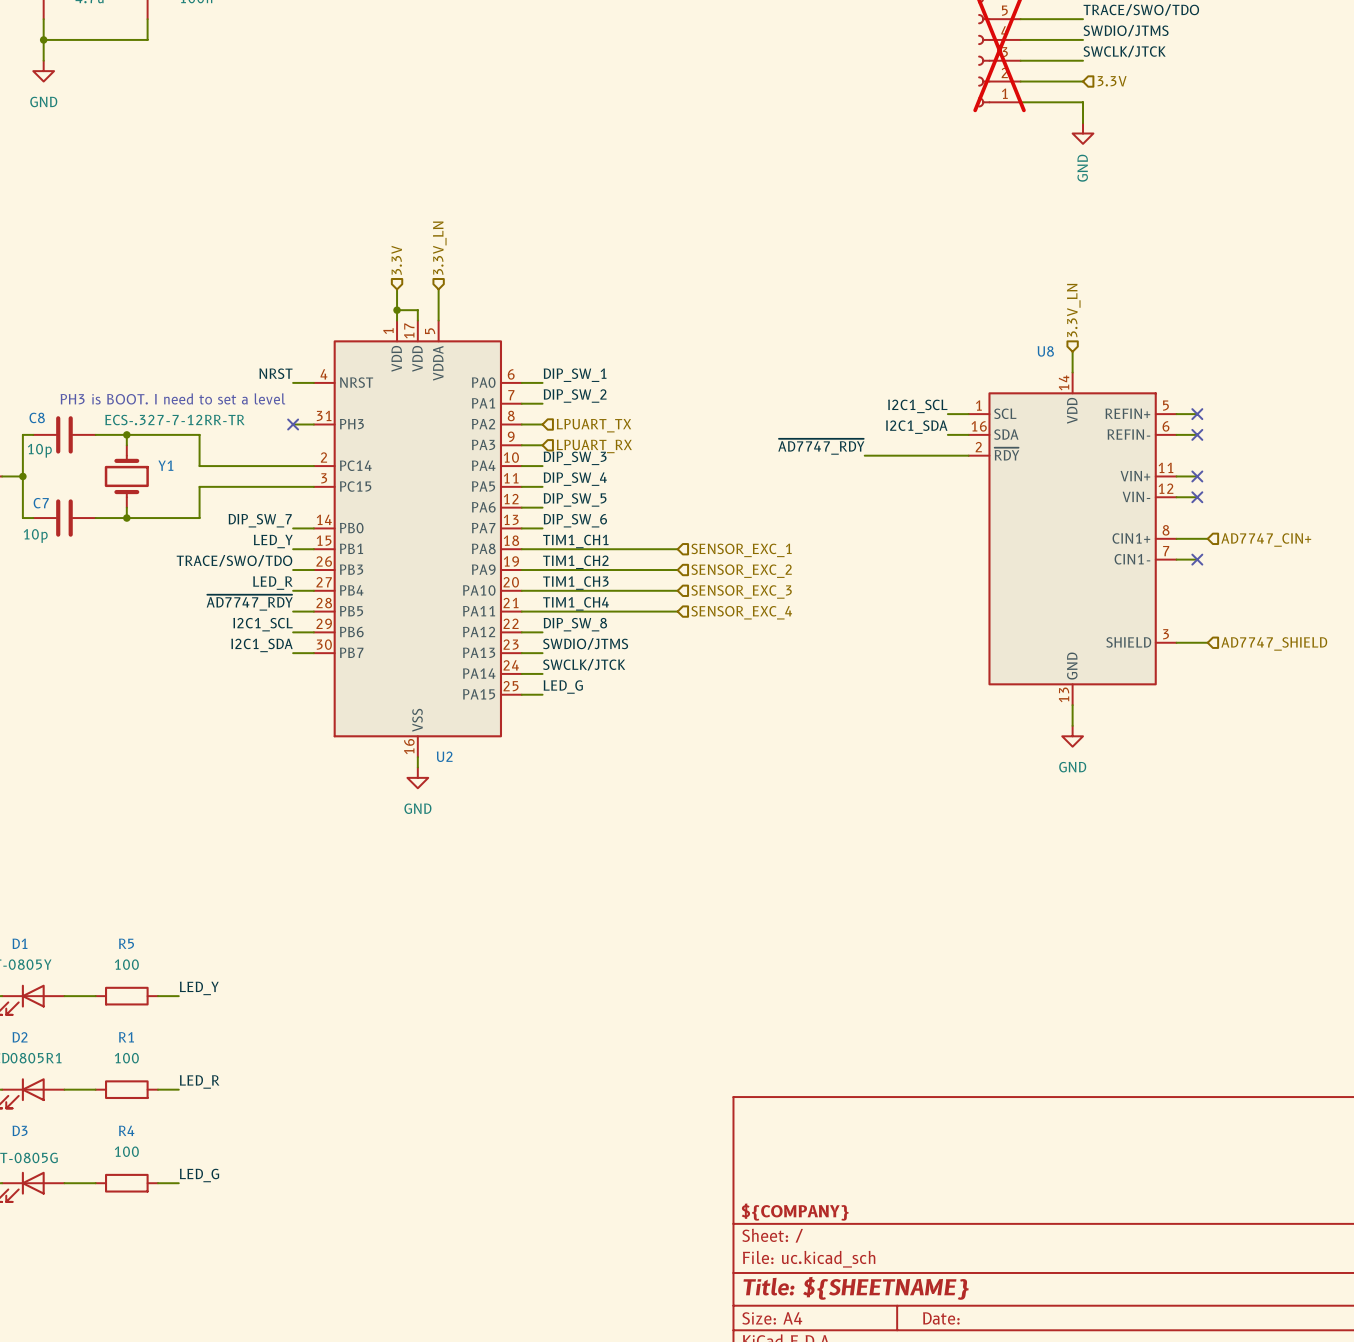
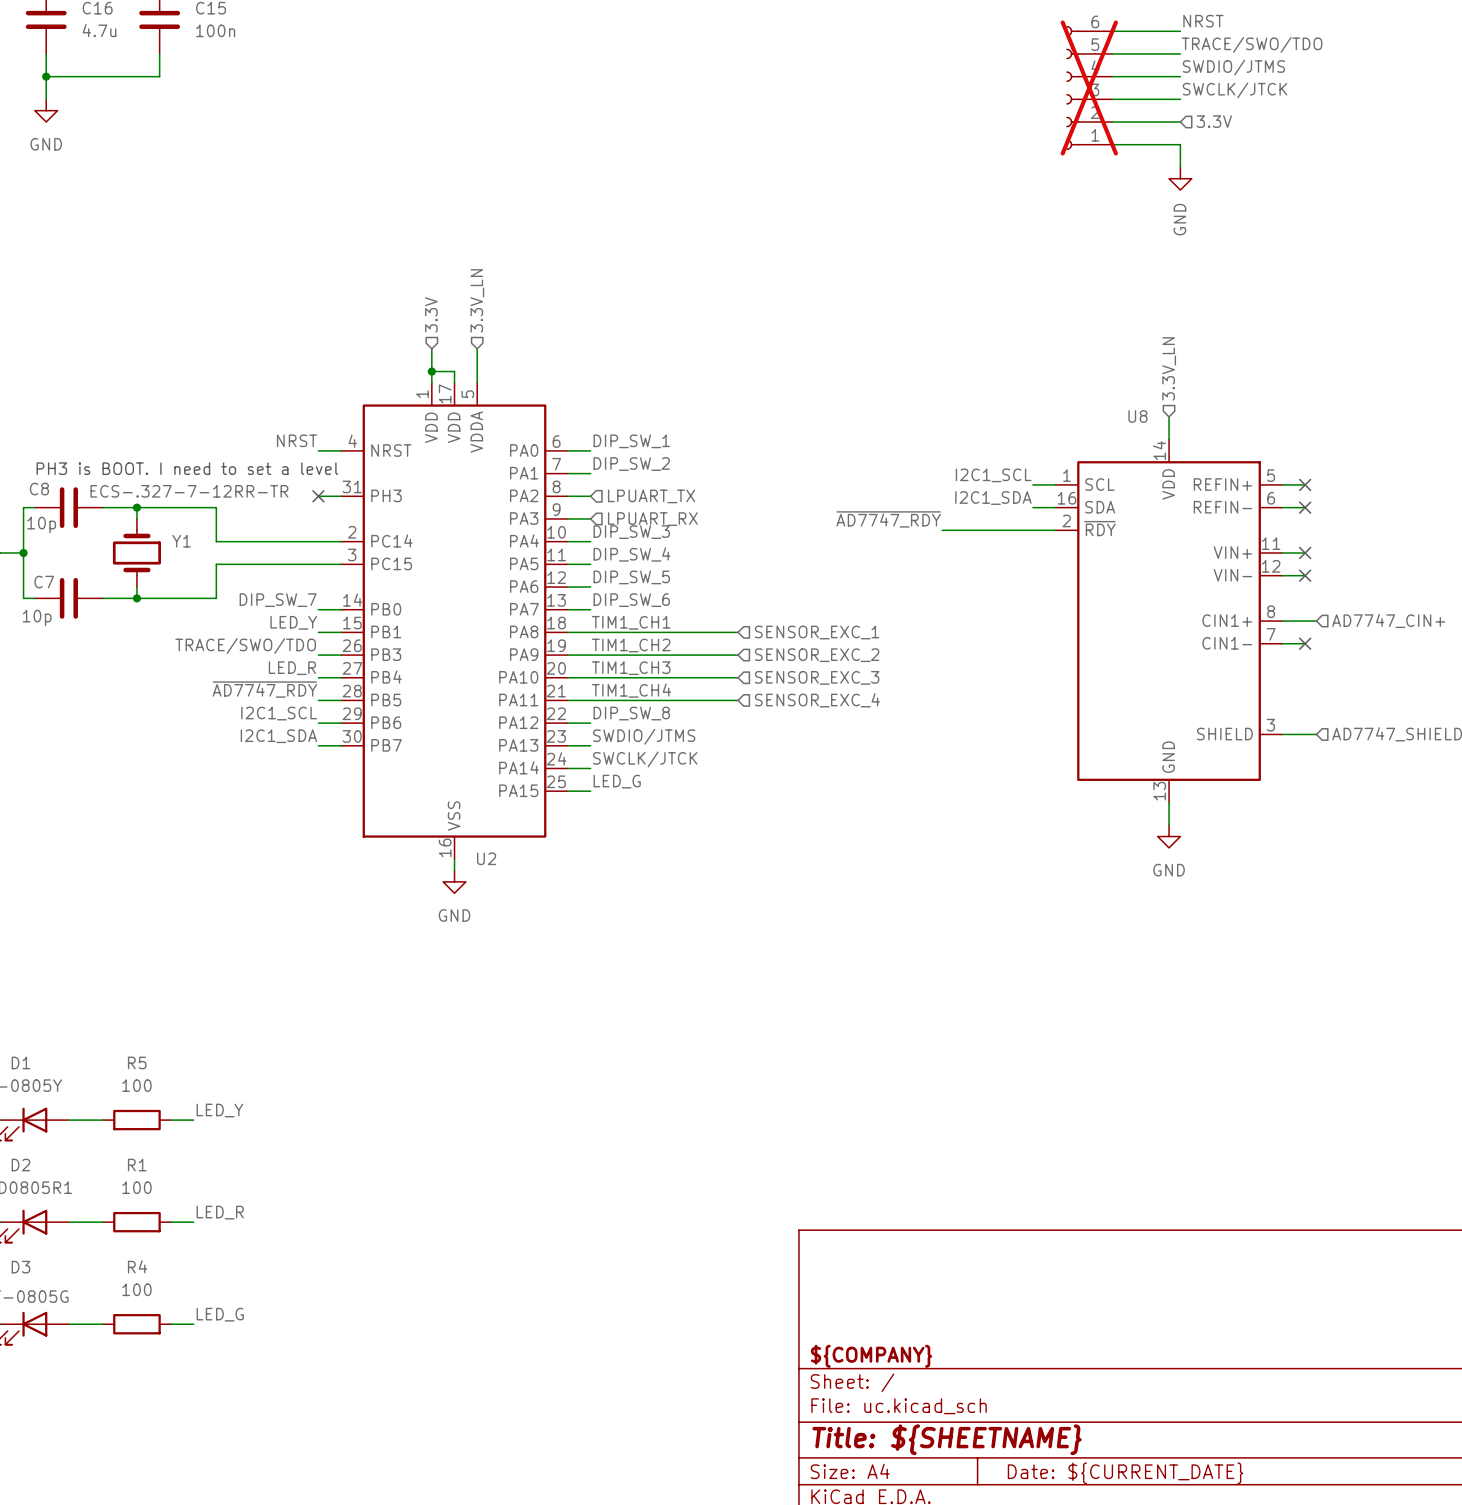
title block: Date: (941, 1318) -> Date: ${CURRENT_DATE} (1125, 1473)

